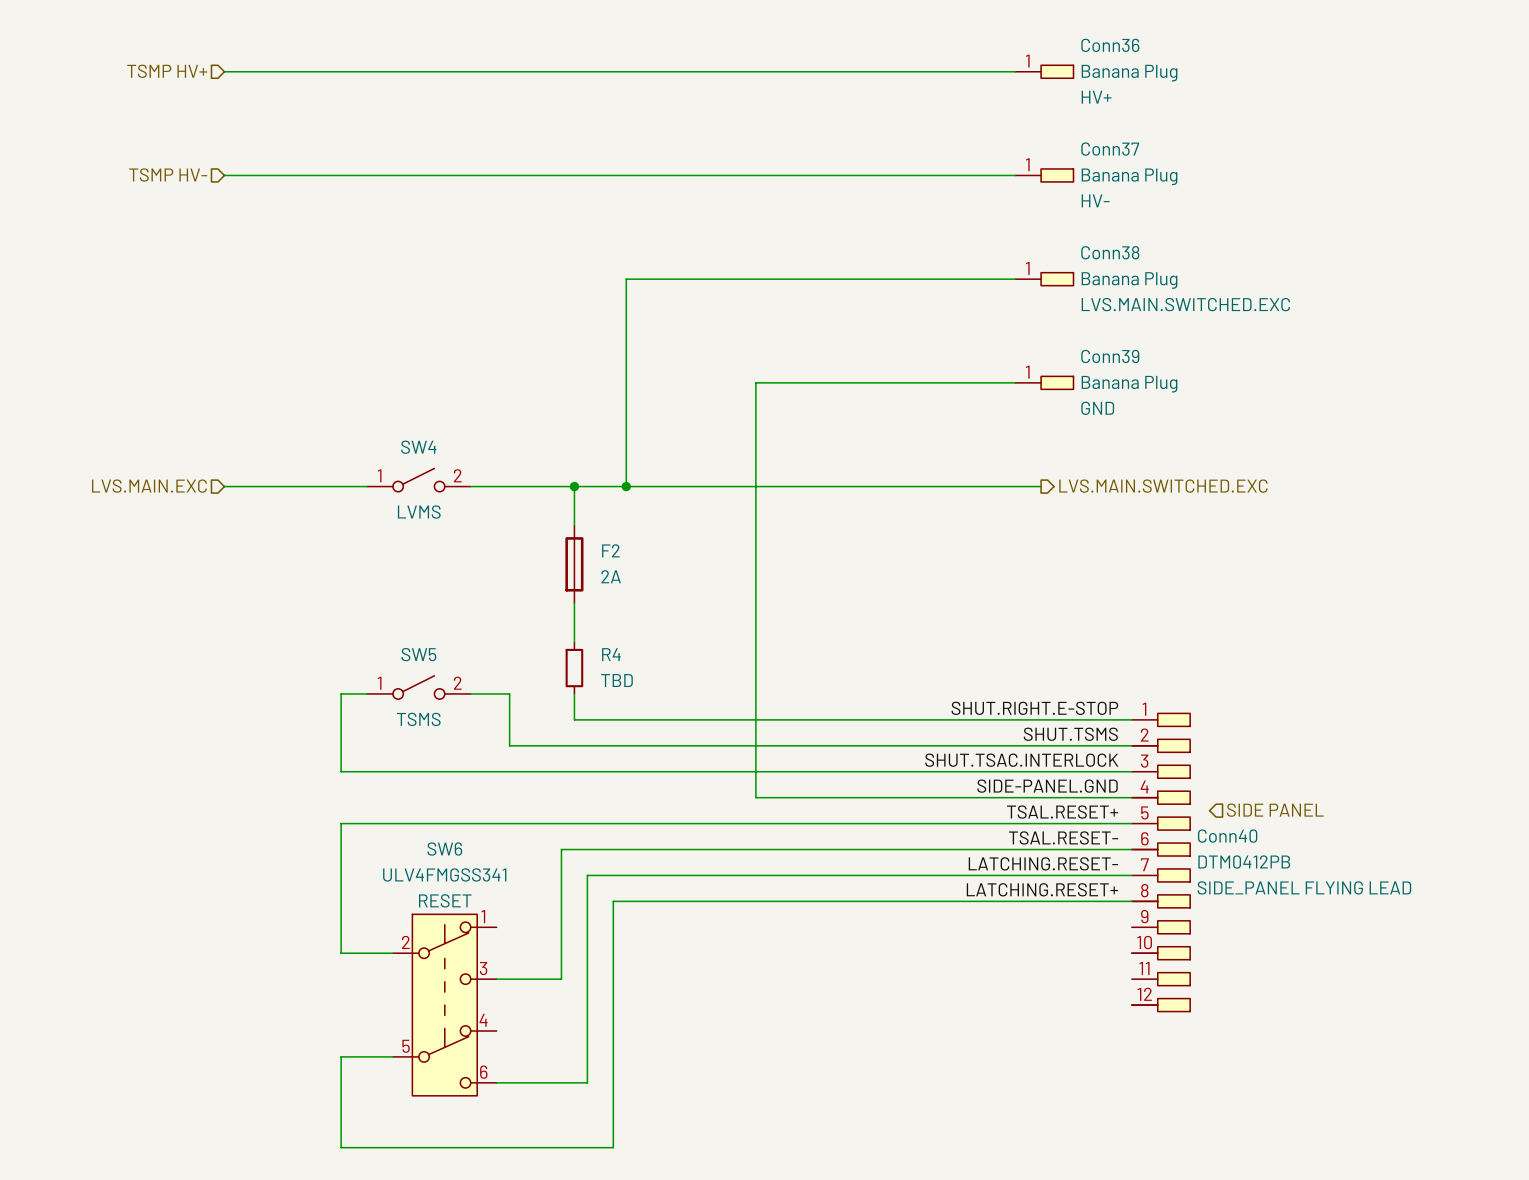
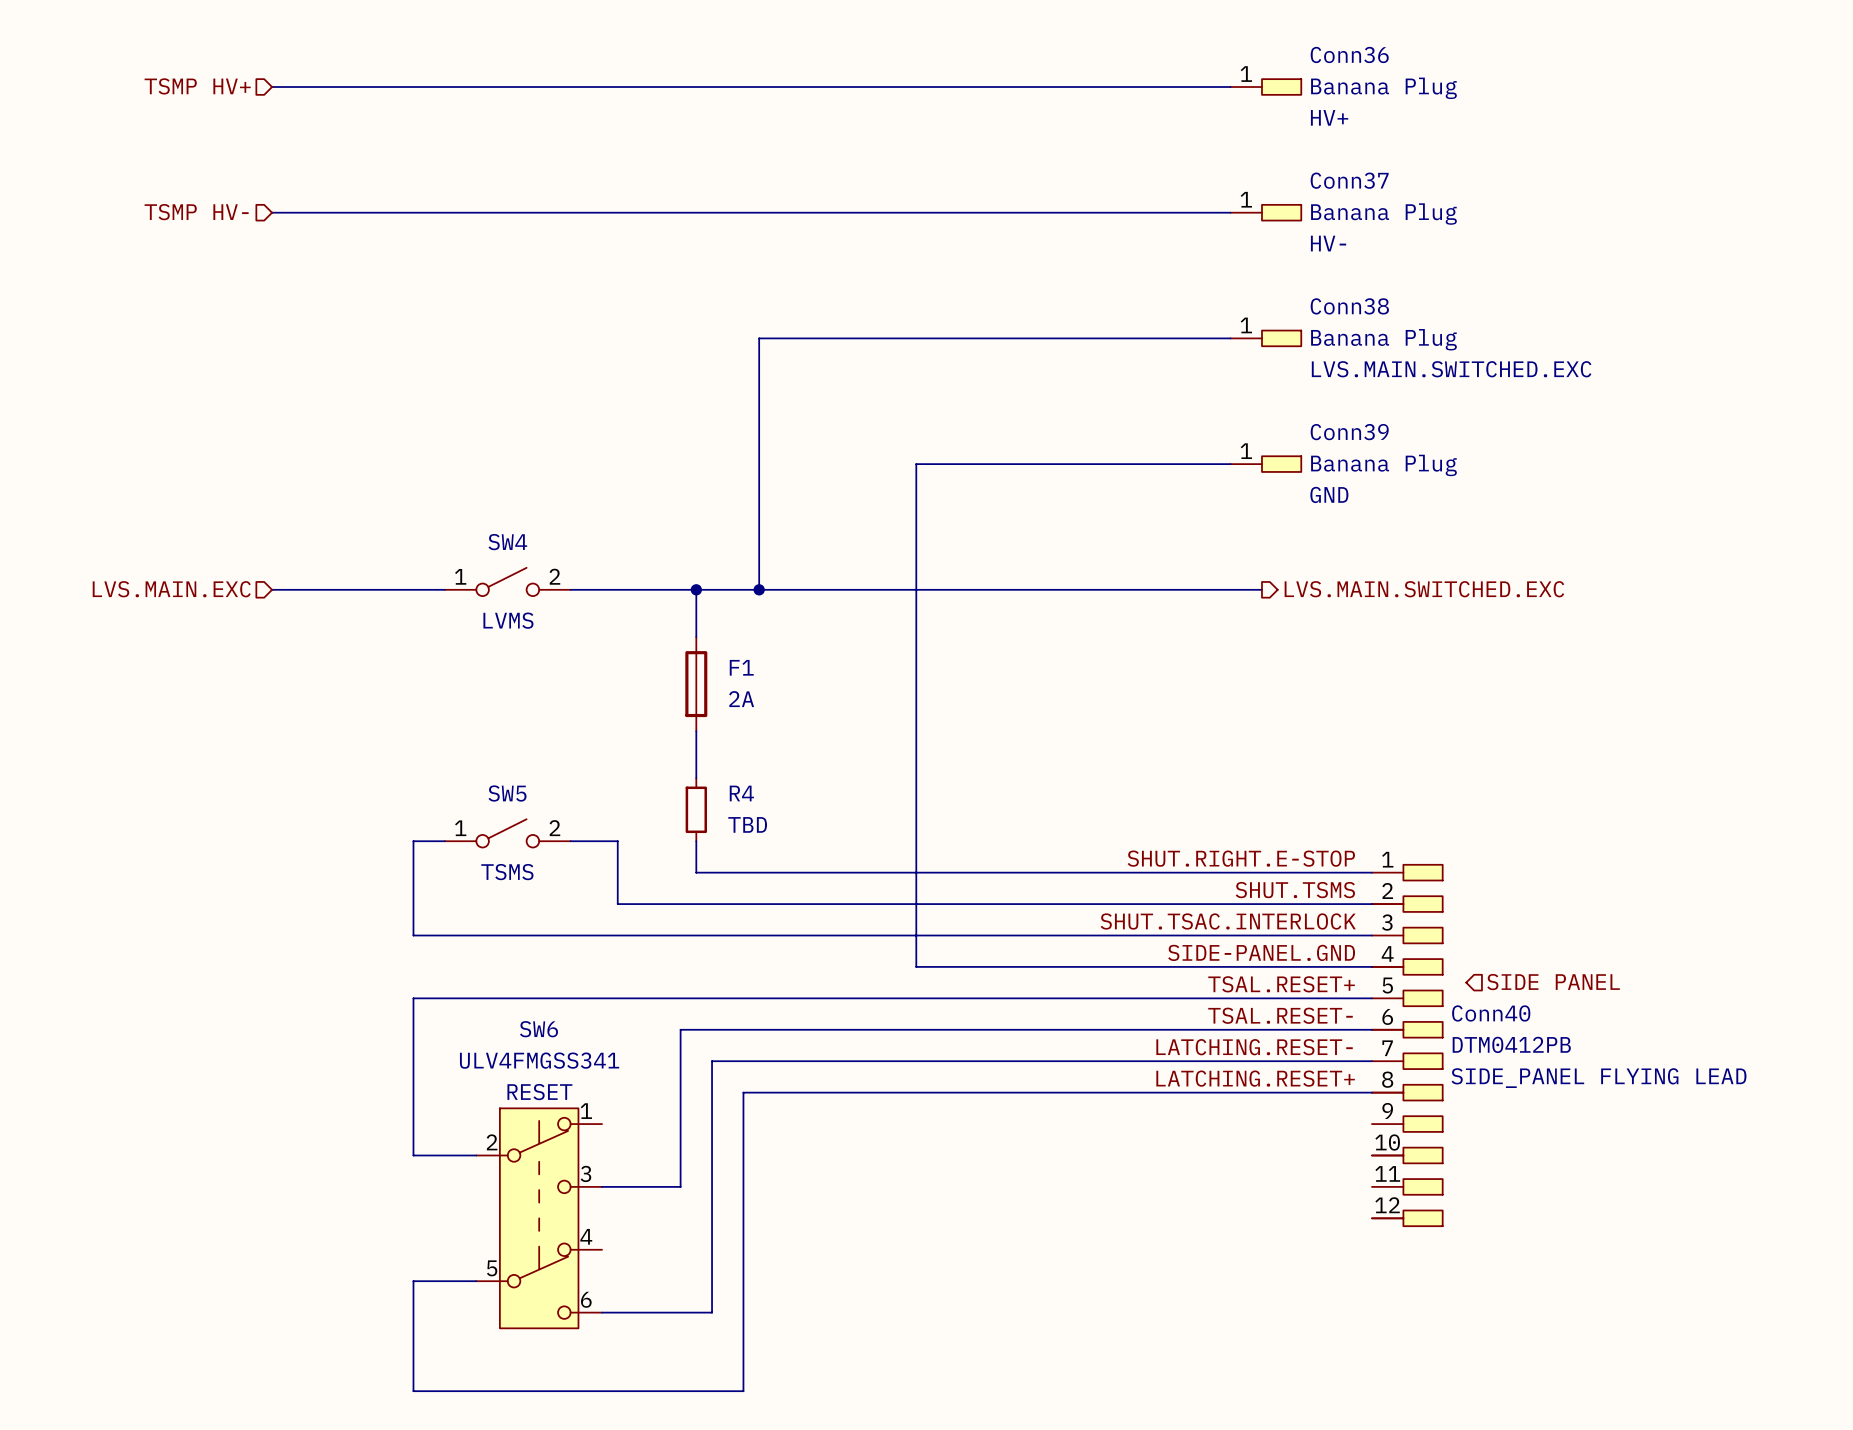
F2 name: F2 (610, 550) -> F1 (741, 667)

